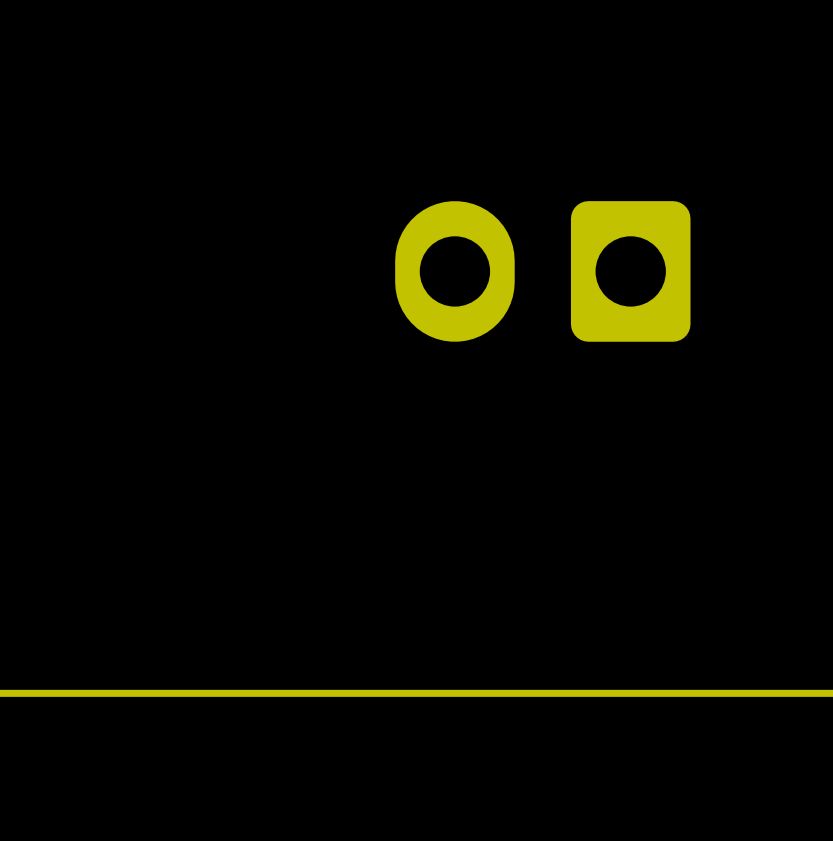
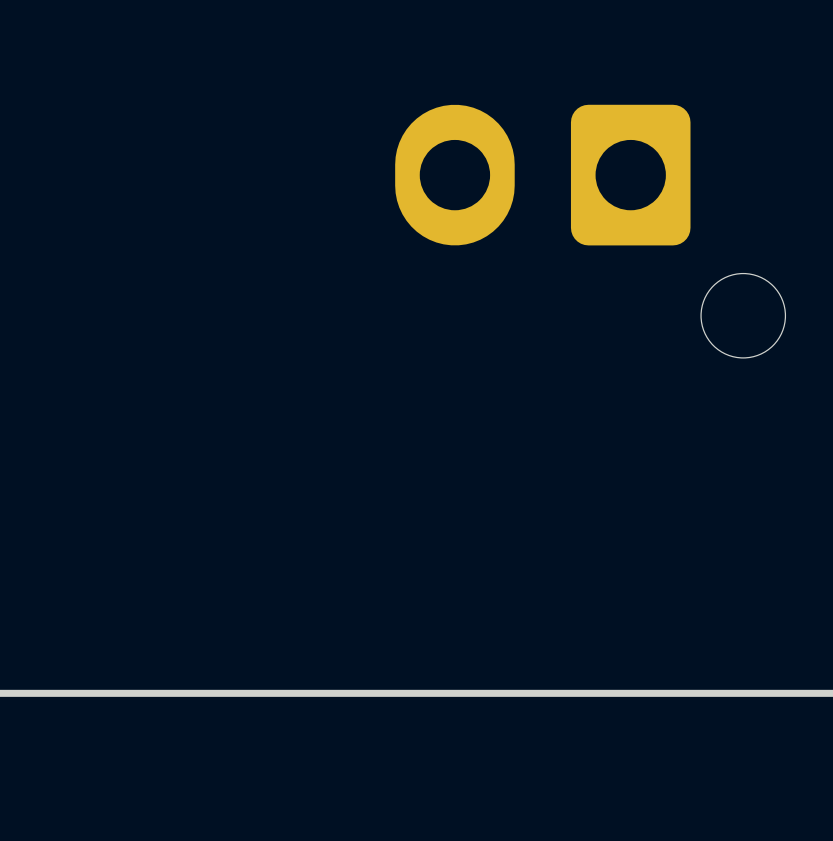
part footprint: [395, 201, 691, 342] -> [395, 104, 786, 358]

